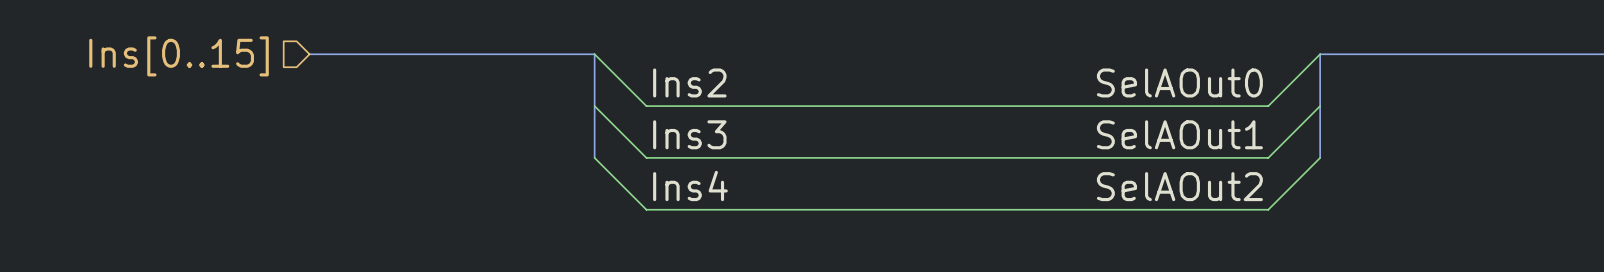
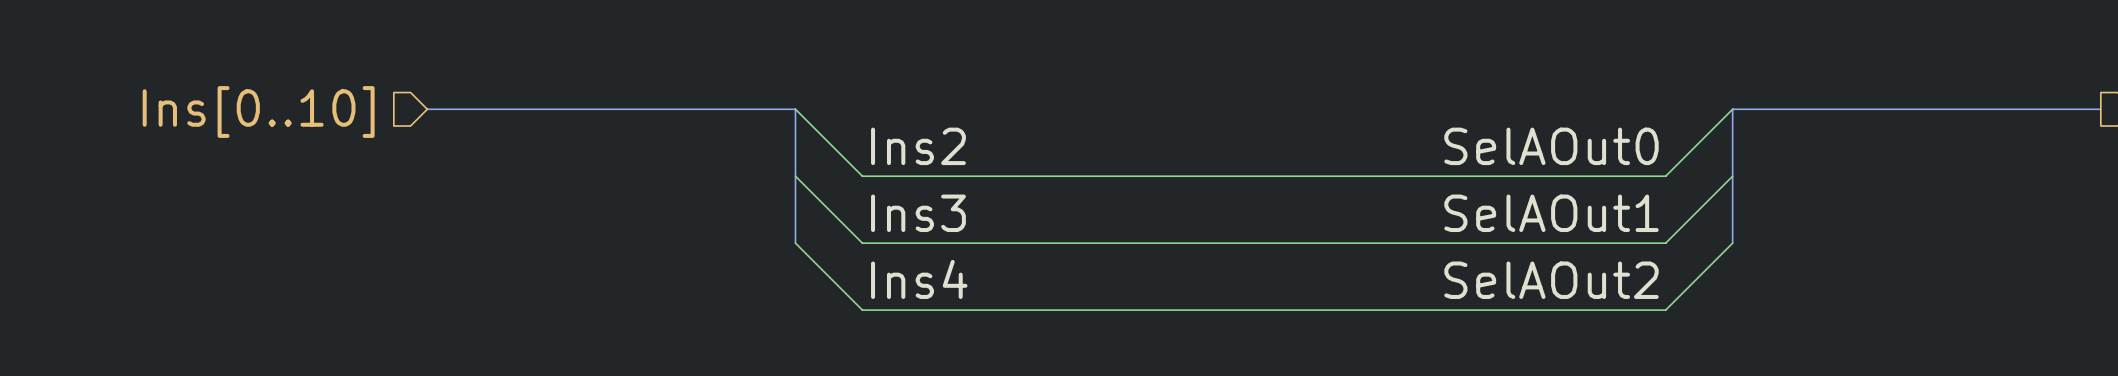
hierarchical label: Ins[0..15] (179, 56) -> Ins[0..10] (258, 112)

